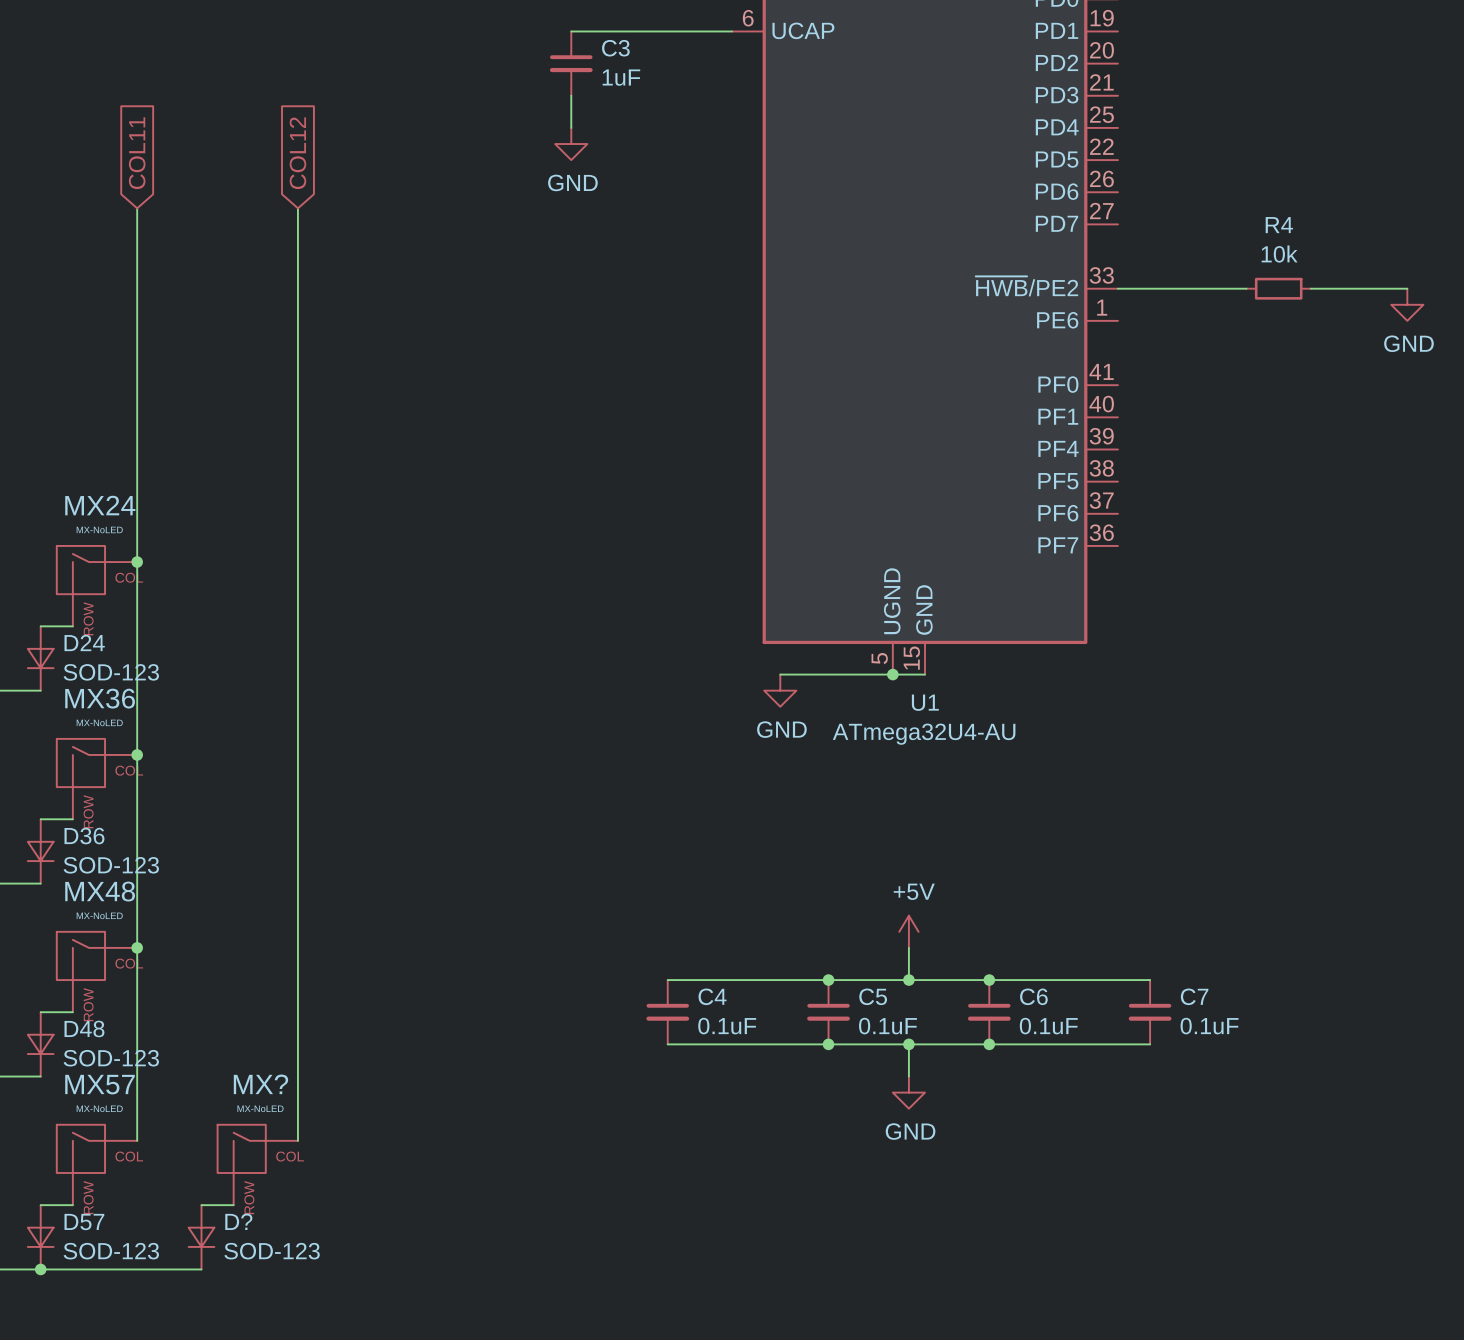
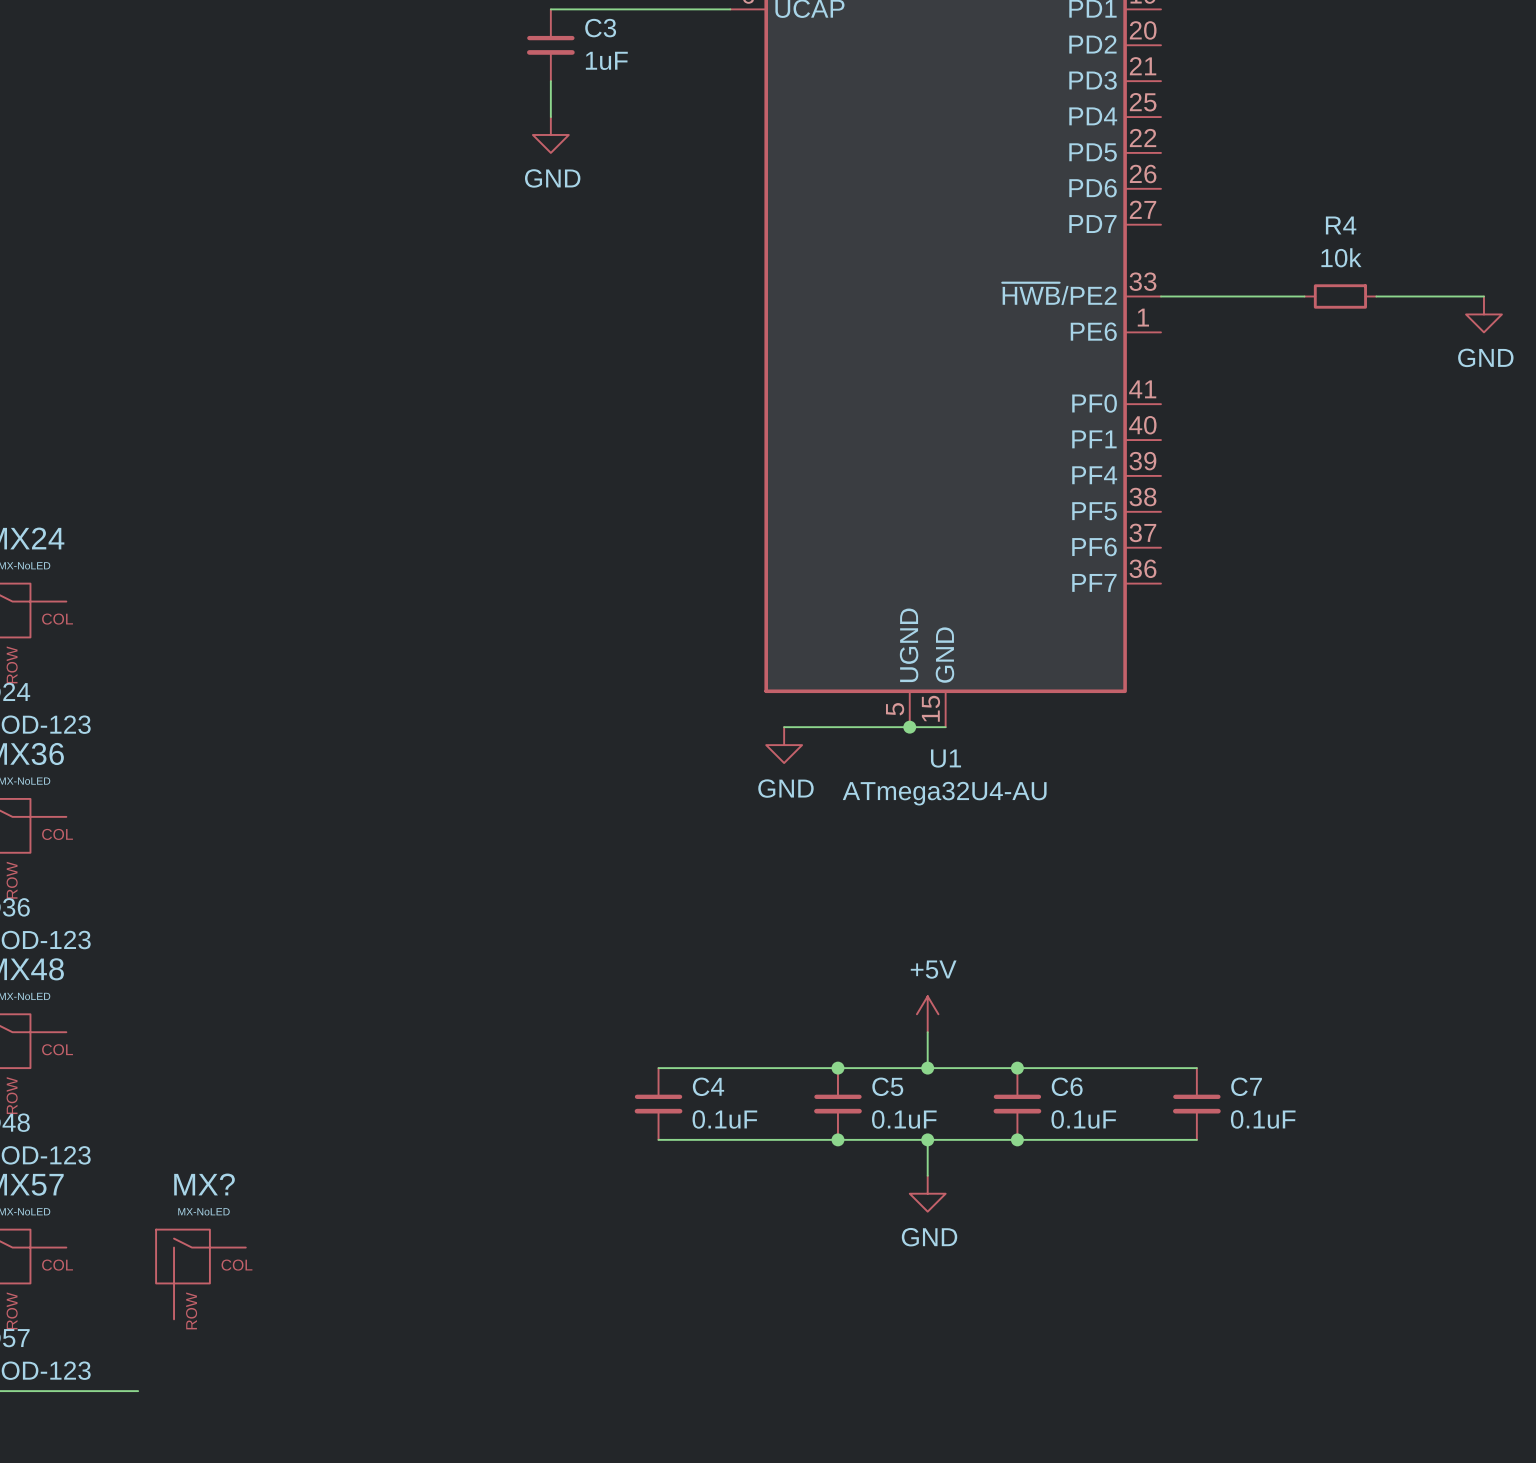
global label: COL11 (137, 153) -> none
global label: COL12 (297, 153) -> none
wire: (137, 208) (137, 1140) -> none
wire: (297, 208) (297, 1140) -> none
junction: (137, 562) -> none
junction: (137, 754) -> none
junction: (137, 947) -> none
wire: (201, 1205) (233, 1205) -> none
D?: SOD-123 (201, 1237) -> none

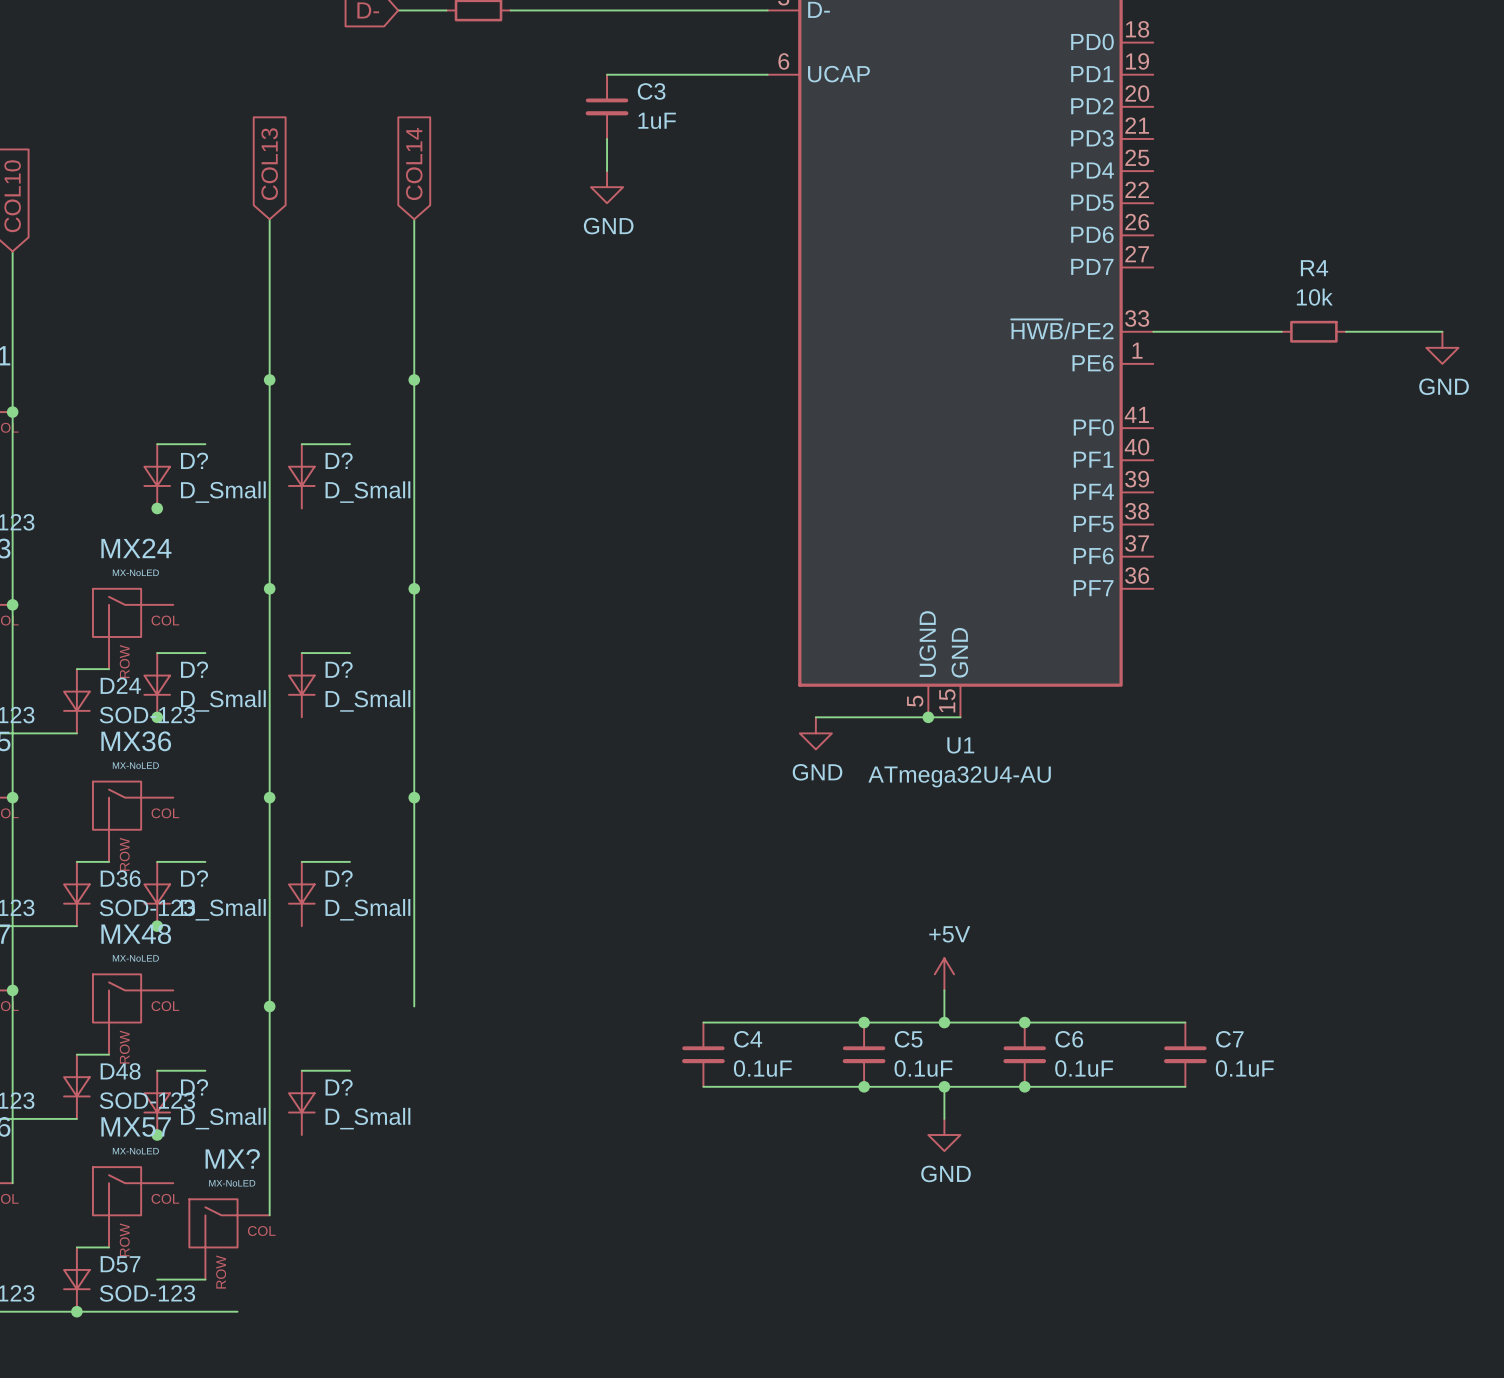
global label: none -> COL13 (269, 164)
global label: none -> COL14 (414, 163)
wire: none -> (269, 219) (269, 1215)
wire: none -> (414, 219) (414, 1006)
junction: none -> (269, 379)
junction: none -> (414, 379)
wire: none -> (157, 444) (205, 444)
wire: none -> (301, 444) (350, 444)
D?: none -> D_Small (157, 476)
D?: none -> D_Small (301, 476)
junction: none -> (157, 508)
junction: none -> (269, 588)
junction: none -> (414, 588)
wire: none -> (157, 653) (205, 653)
wire: none -> (301, 653) (350, 653)
D?: none -> D_Small (157, 685)
D?: none -> D_Small (301, 685)
junction: none -> (157, 717)
junction: none -> (269, 797)
junction: none -> (414, 797)
wire: none -> (157, 861) (205, 861)
wire: none -> (301, 861) (350, 861)
D?: none -> D_Small (157, 894)
D?: none -> D_Small (301, 894)
junction: none -> (157, 926)
junction: none -> (269, 1006)
wire: none -> (157, 1070) (205, 1070)
wire: none -> (301, 1070) (350, 1070)
D?: none -> D_Small (157, 1102)
D?: none -> D_Small (301, 1102)
junction: none -> (157, 1135)
MX? position: (200, 1274) -> (229, 1239)
wire: none -> (157, 1279) (205, 1279)

